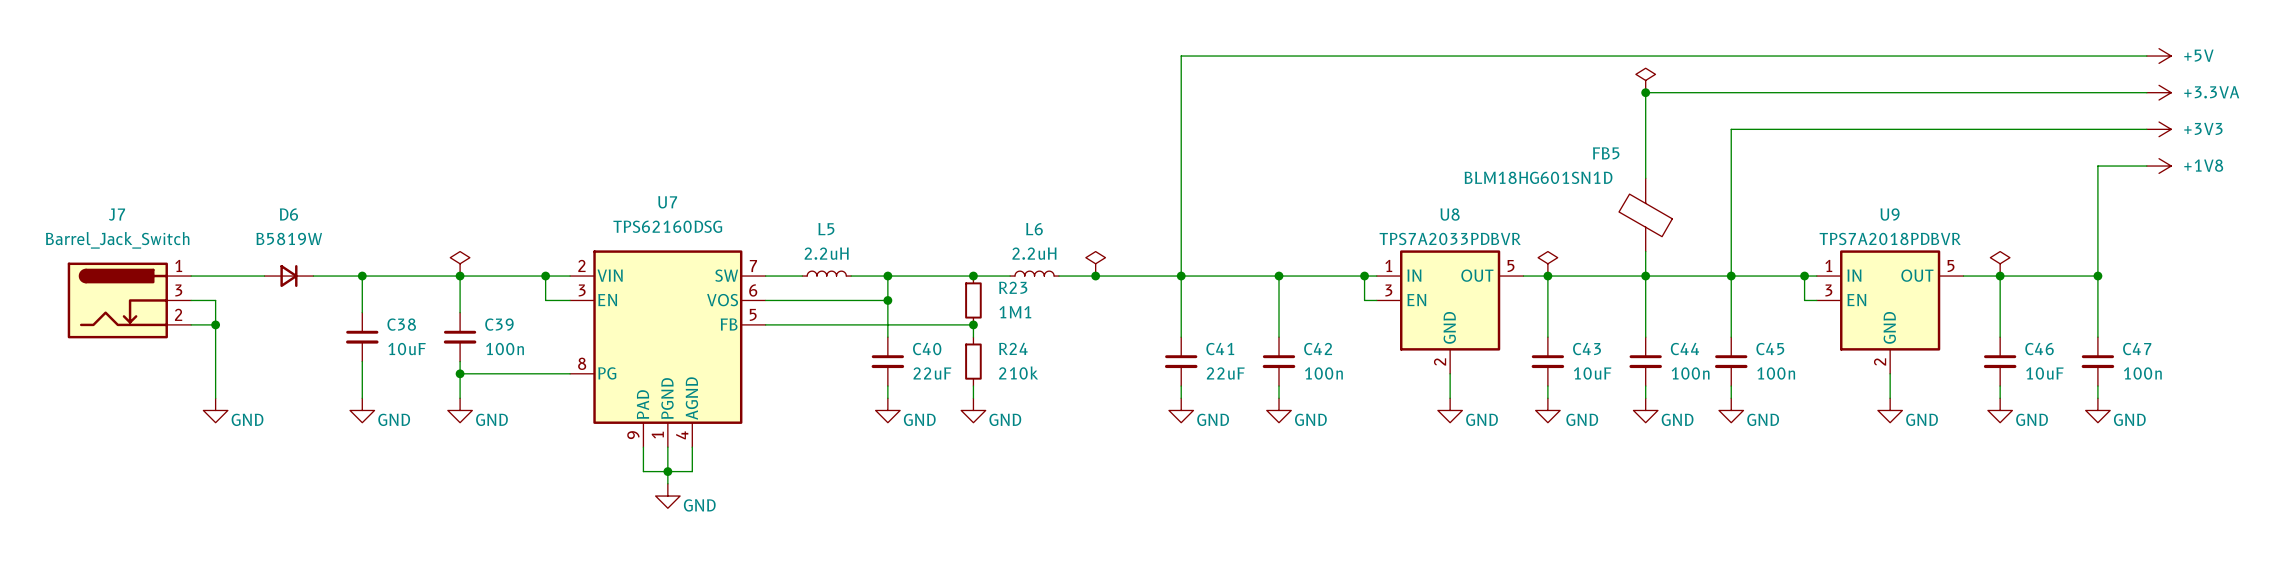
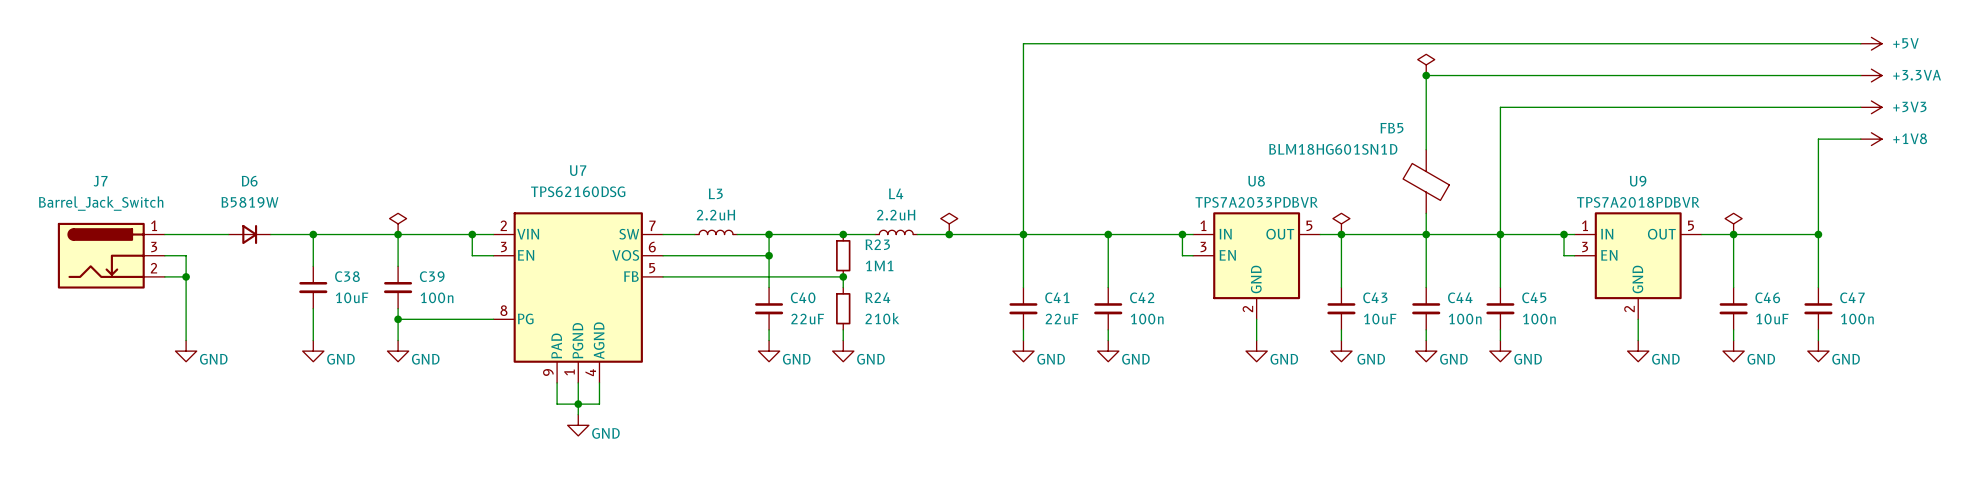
L5 name: L5 (826, 229) -> L3 (715, 193)
L6 name: L6 (1034, 229) -> L4 (896, 193)

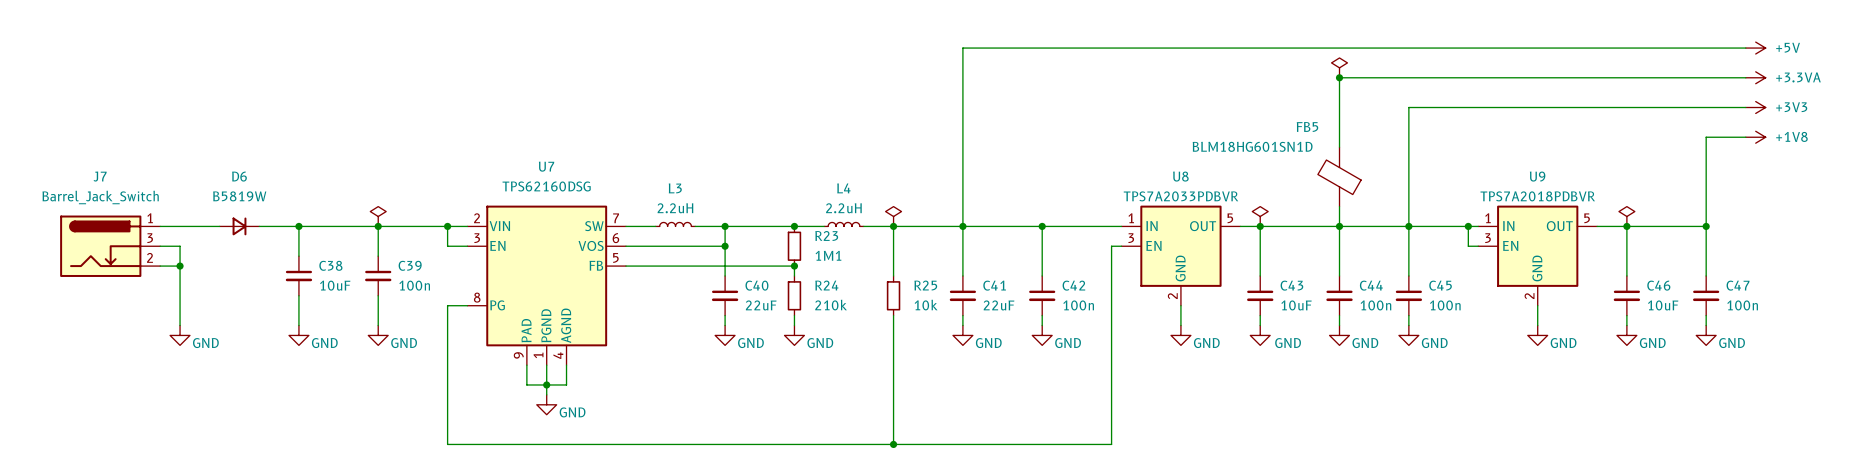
wire: none -> (893, 226) (893, 275)
wire: (1182, 234) (1182, 255) -> (447, 305) (447, 444) (1111, 444) (1111, 246)
junction: (1182, 234) -> none
R25: none -> 10k (893, 295)
wire: (398, 319) (472, 319) -> none
junction: (398, 319) -> none
wire: none -> (893, 315) (893, 444)
junction: none -> (893, 444)

